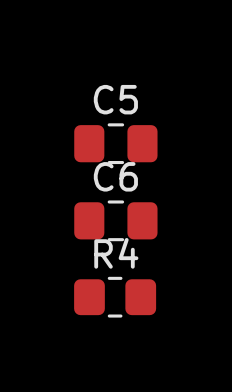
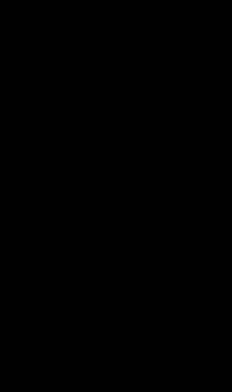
C5: (115, 143) -> none
C6: (115, 220) -> none
R4: (115, 297) -> none

